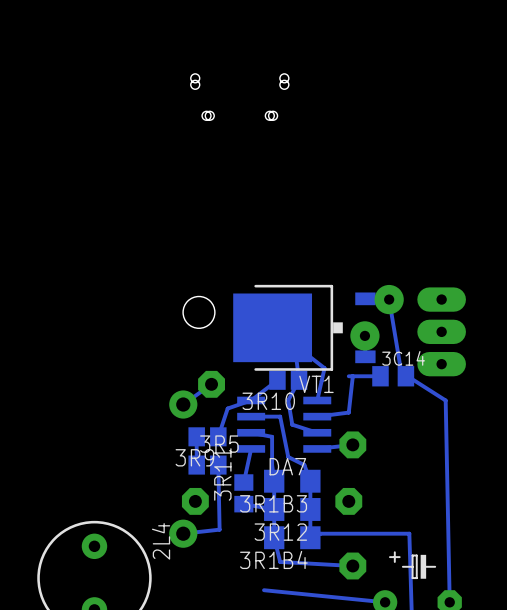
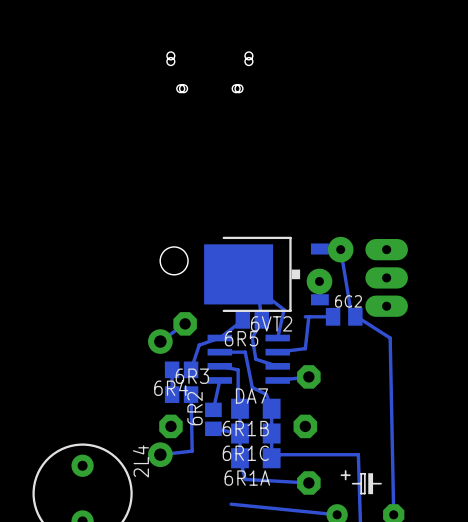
3C14 name: 3C14 (403, 358) -> 6C2 (348, 301)
VT1 name: VT1 (316, 384) -> 6VT2 (271, 323)
3R10 name: 3R10 (268, 401) -> 6R5 (241, 338)
3R5 name: 3R5 (219, 444) -> 6R3 (192, 376)
3R9 name: 3R9 (194, 457) -> 6R4 (171, 387)
3R11 name: 3R11 (222, 474) -> 6R2 (195, 408)
3R1B3 name: 3R1B3 (273, 503) -> 6R1B (245, 428)
3R12 name: 3R12 (280, 532) -> 6R1C (245, 453)
3R1B4 name: 3R1B4 (273, 559) -> 6R1A (247, 478)

